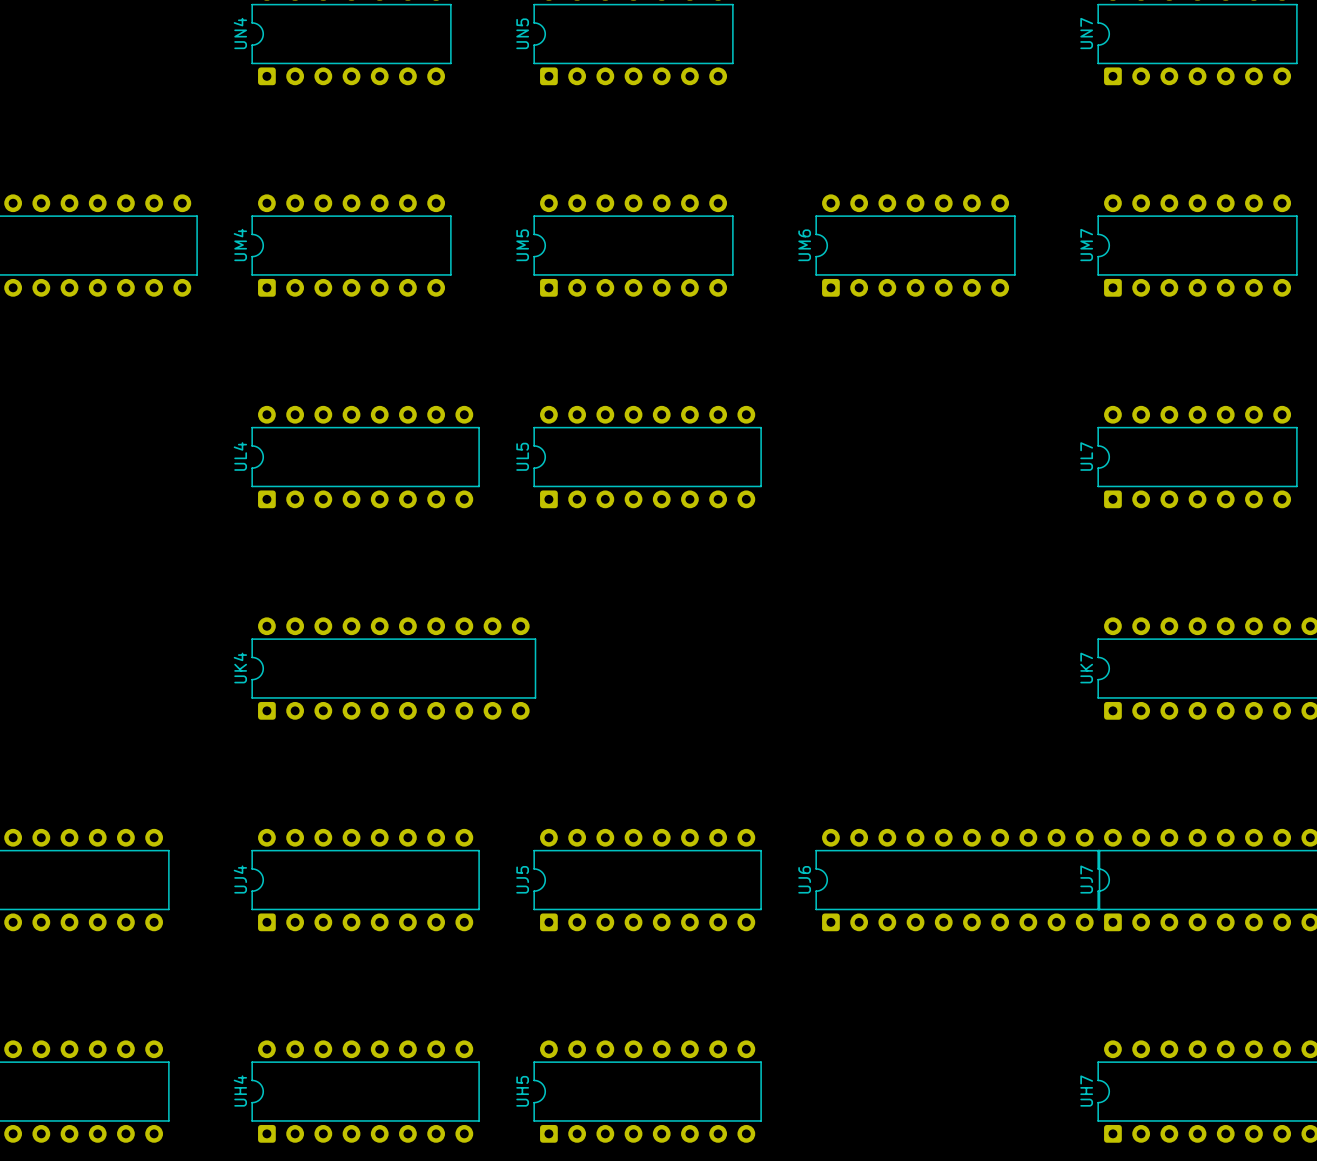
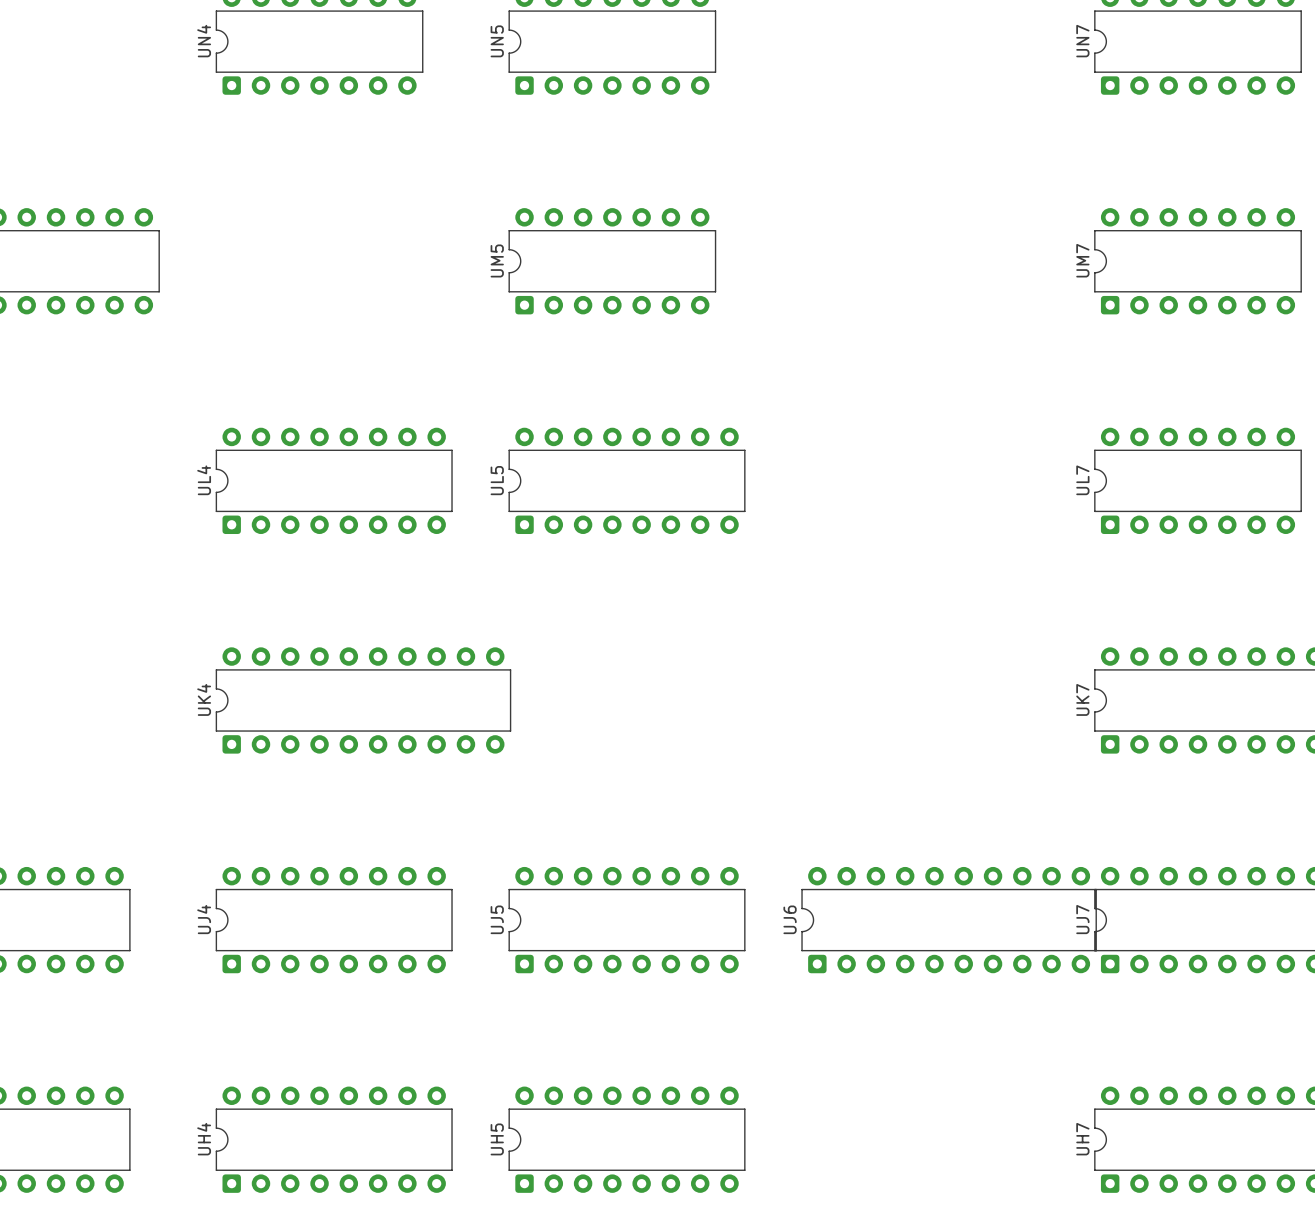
UM4: (351, 245) -> none
UM6: (915, 245) -> none

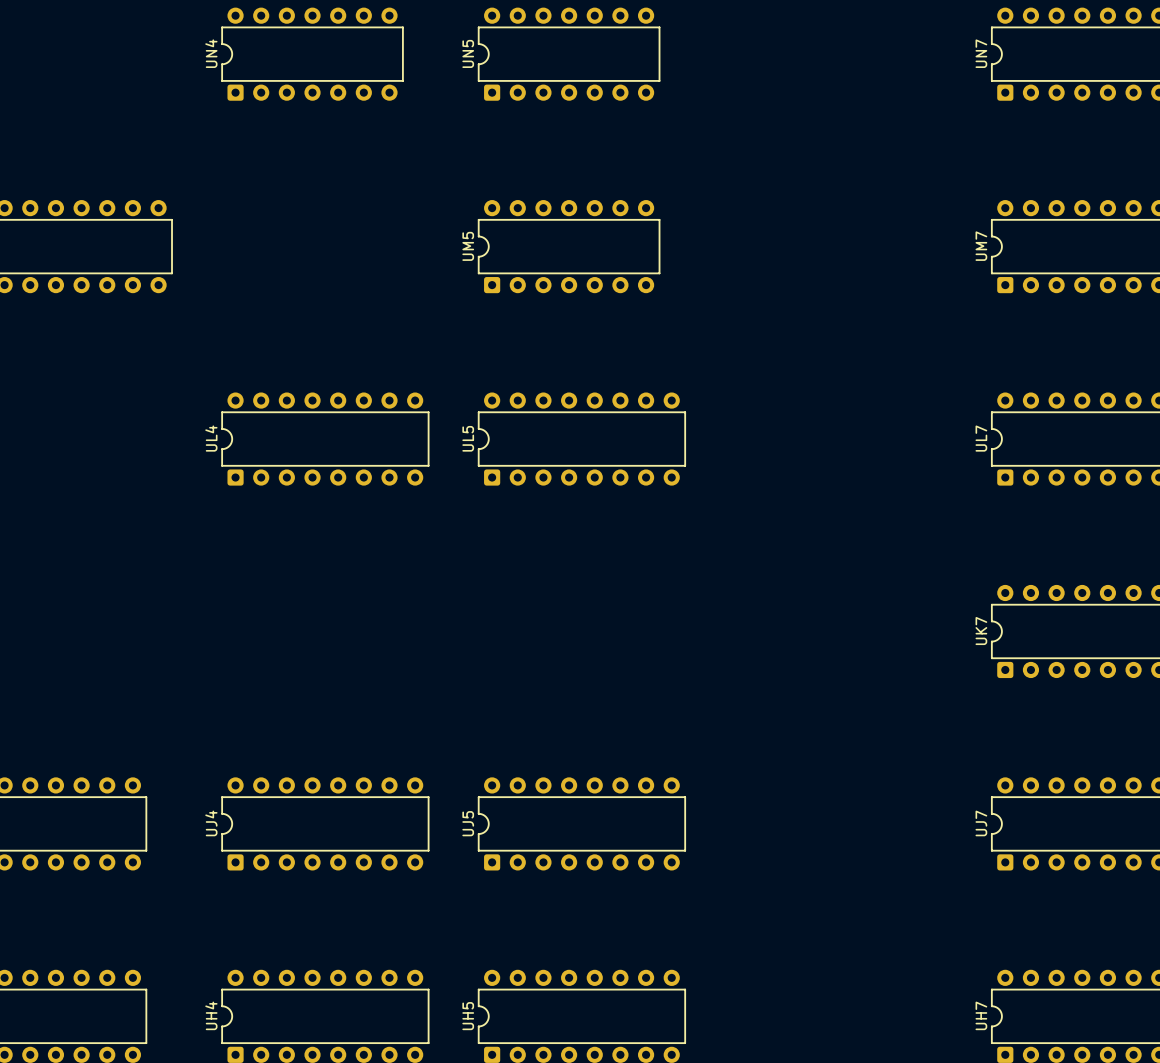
UK4: (363, 700) -> none
UJ6: (949, 920) -> none

